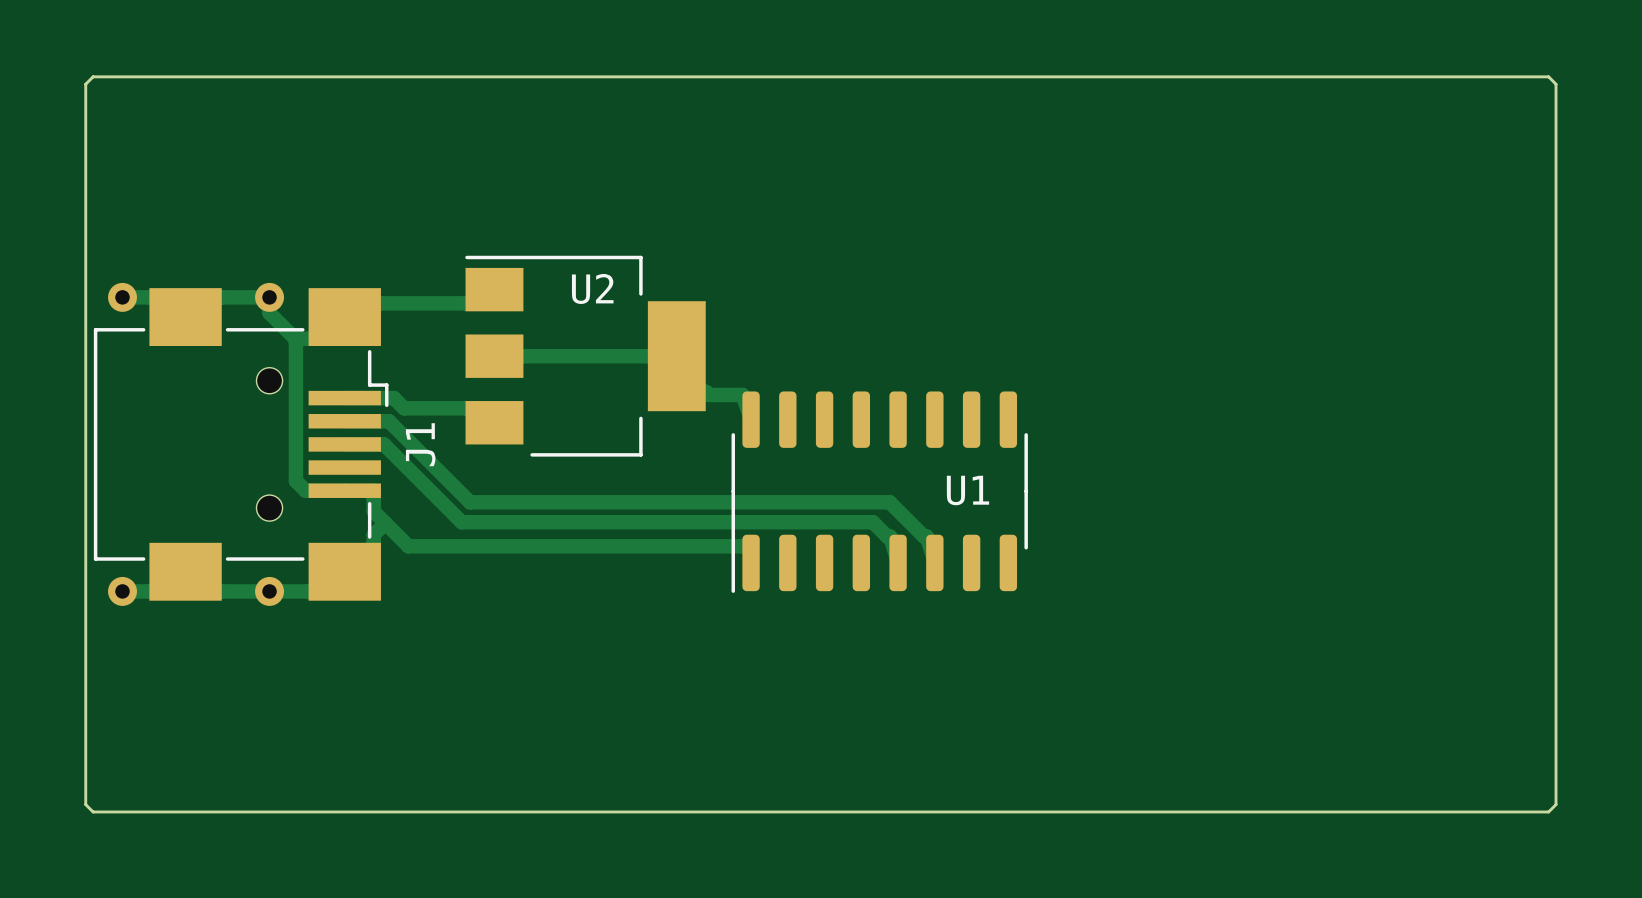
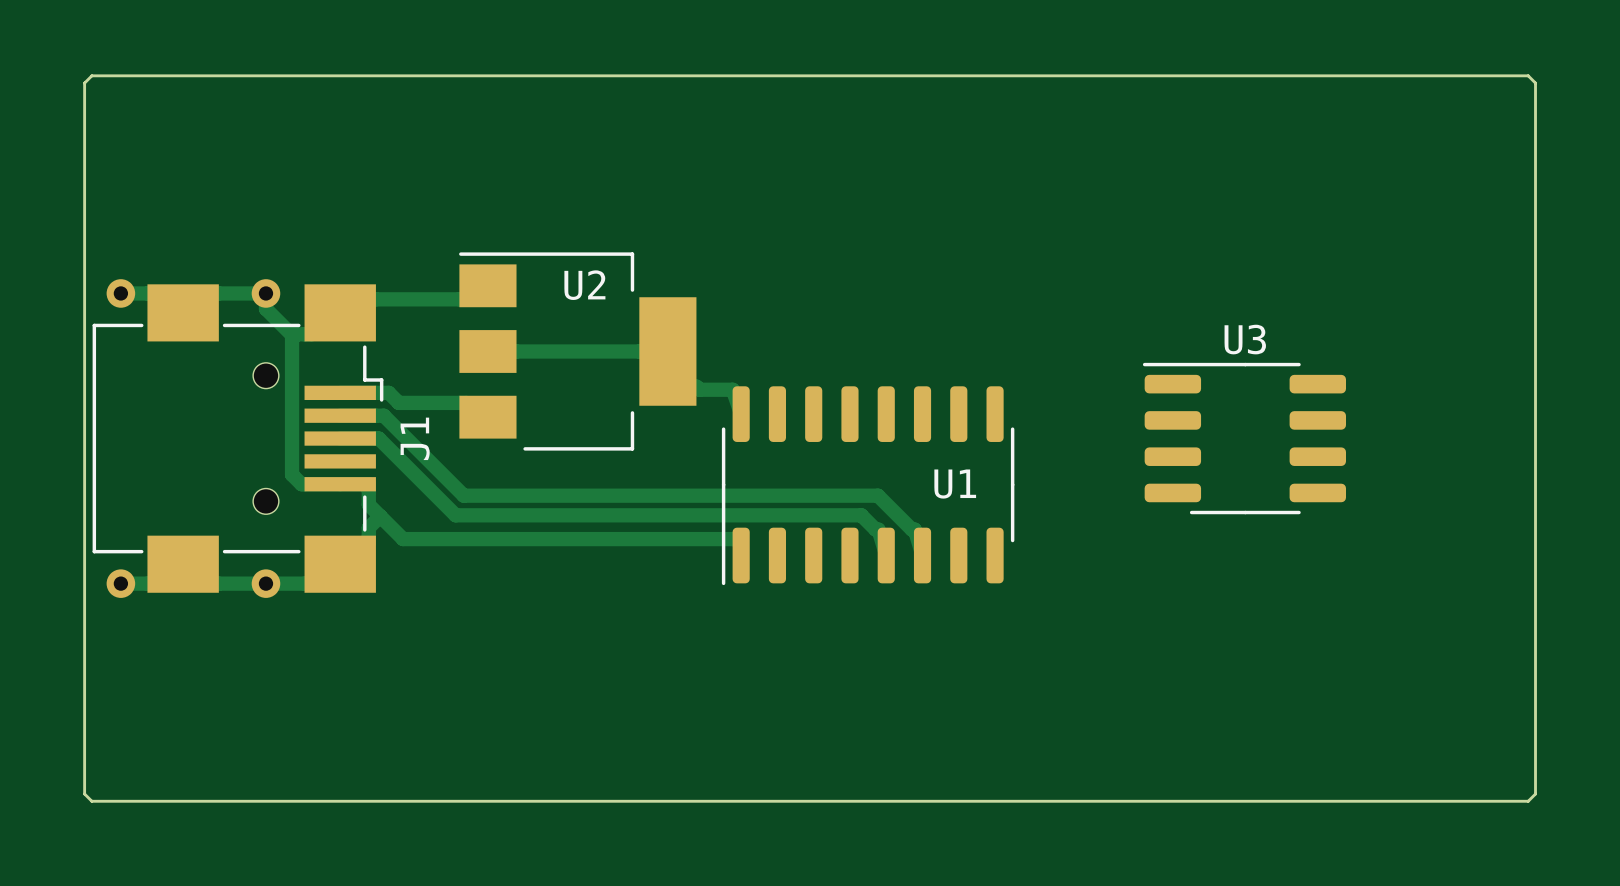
U3: none -> (1244, 438)

